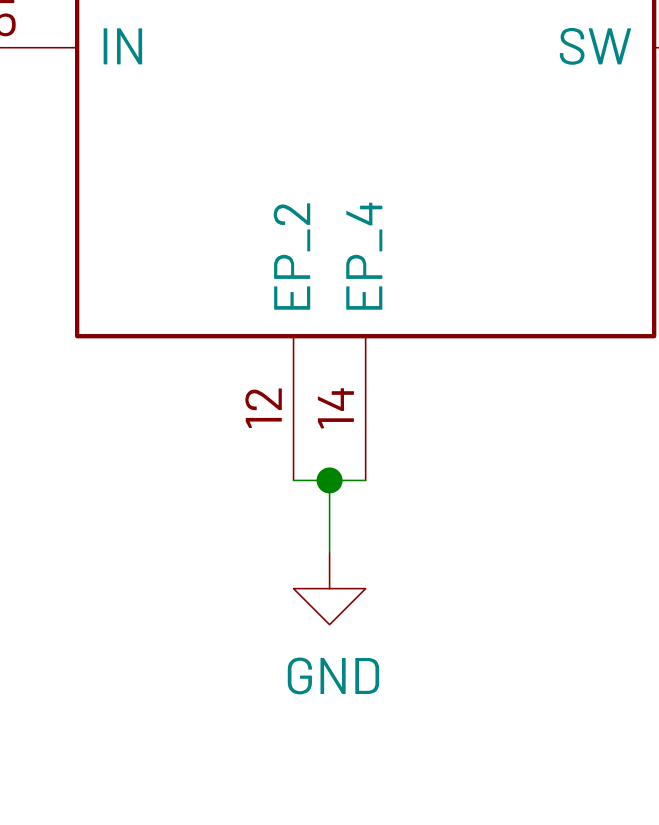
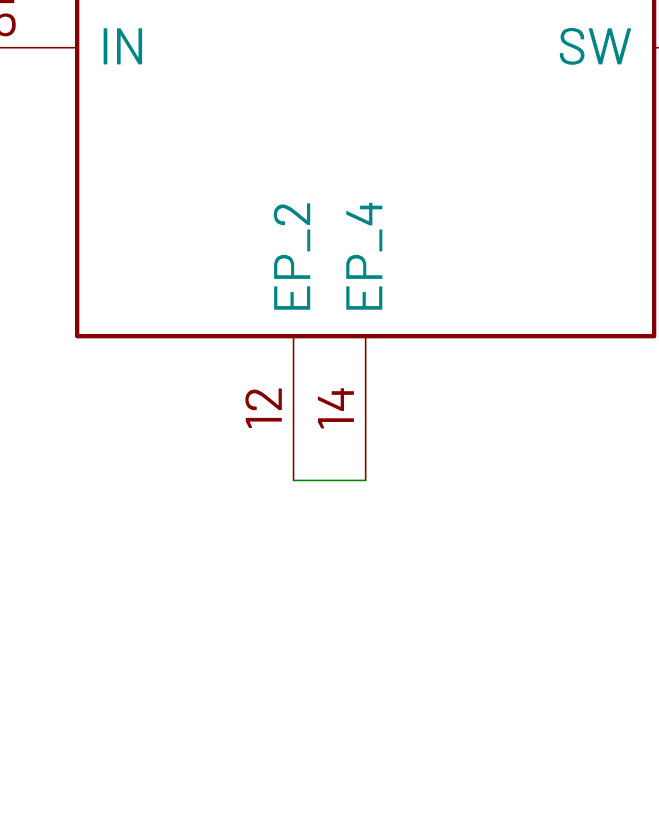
wire: (329, 480) (329, 552) -> none
junction: (329, 480) -> none
power symbol: GND (329, 588) -> none

